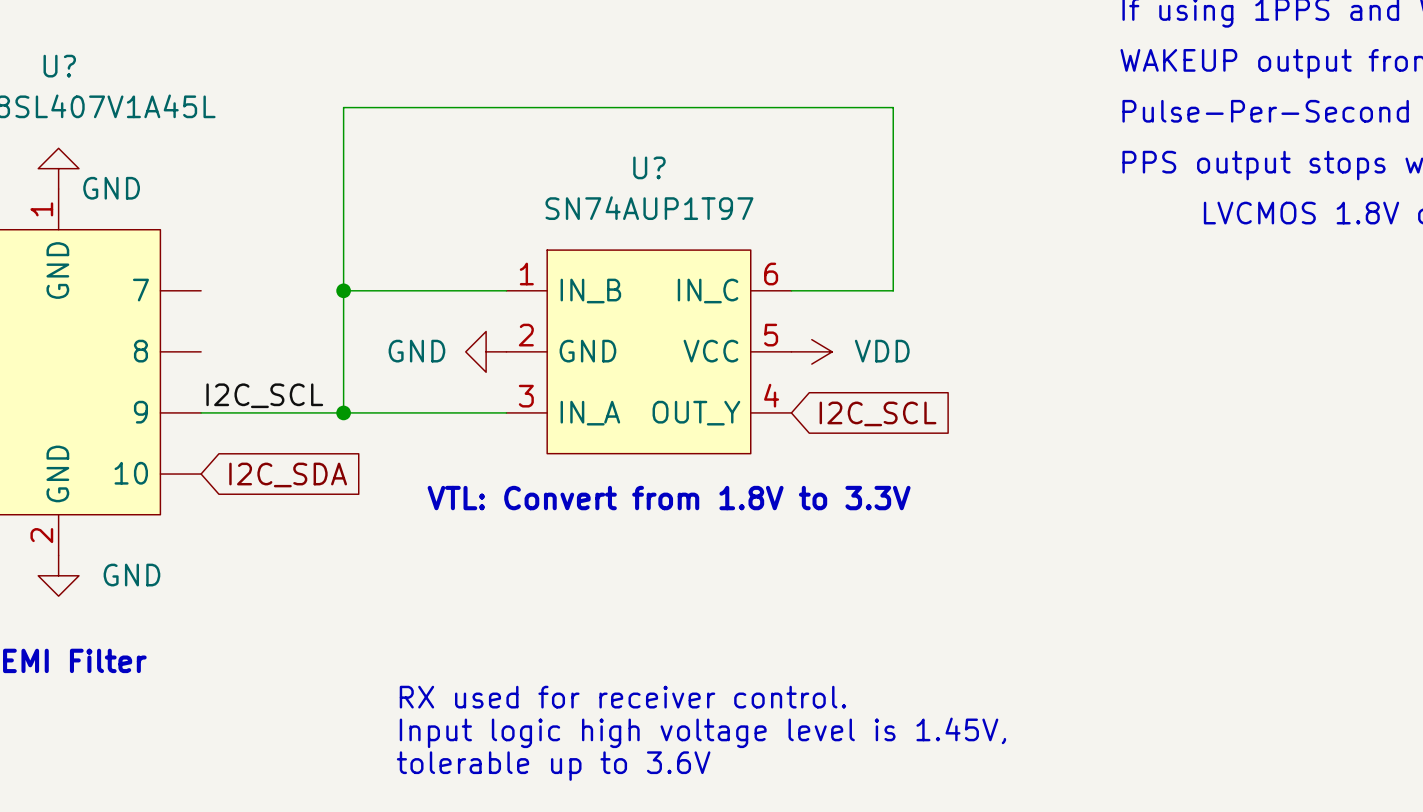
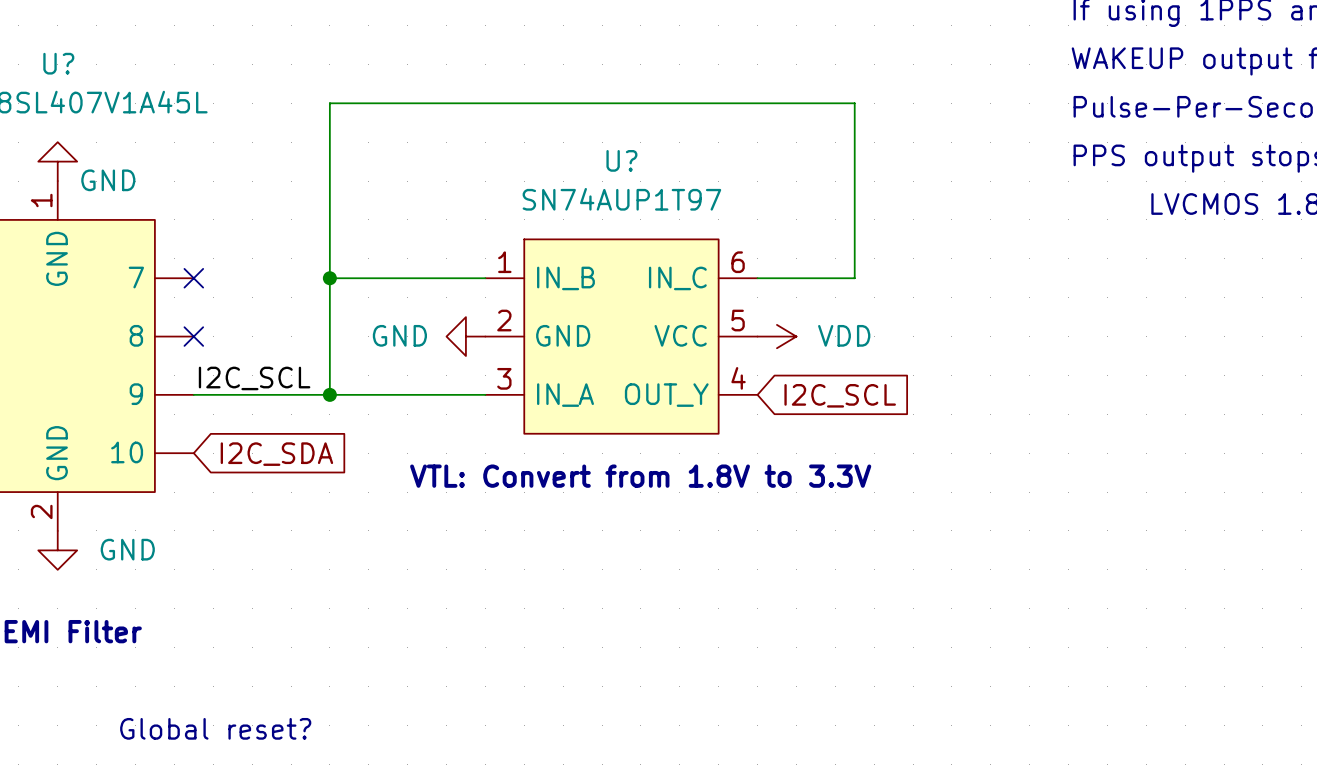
no-connect mark: none -> (193, 278)
no-connect mark: none -> (193, 336)
text: RX used for receiver control. (622, 697) -> none
text: Input logic high voltage level is 1.45V, (702, 732) -> none
text: none -> Global reset? (215, 728)
text: tolerable up to 3.6V (553, 766) -> none

